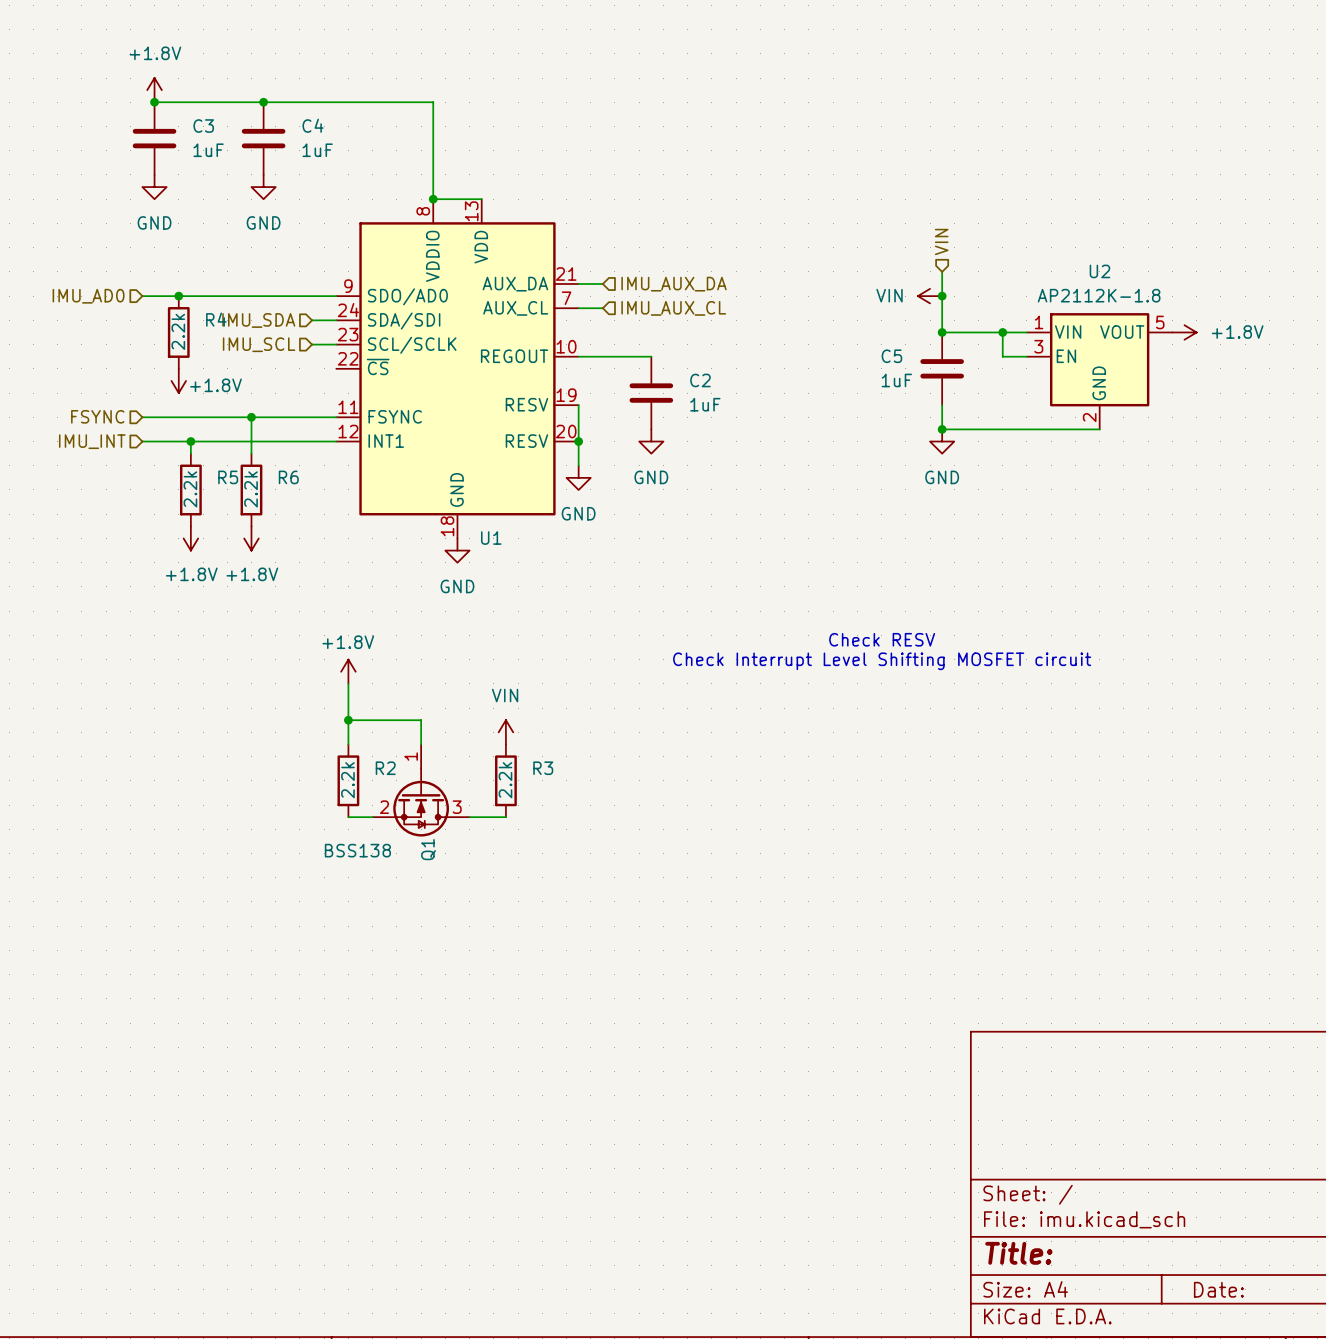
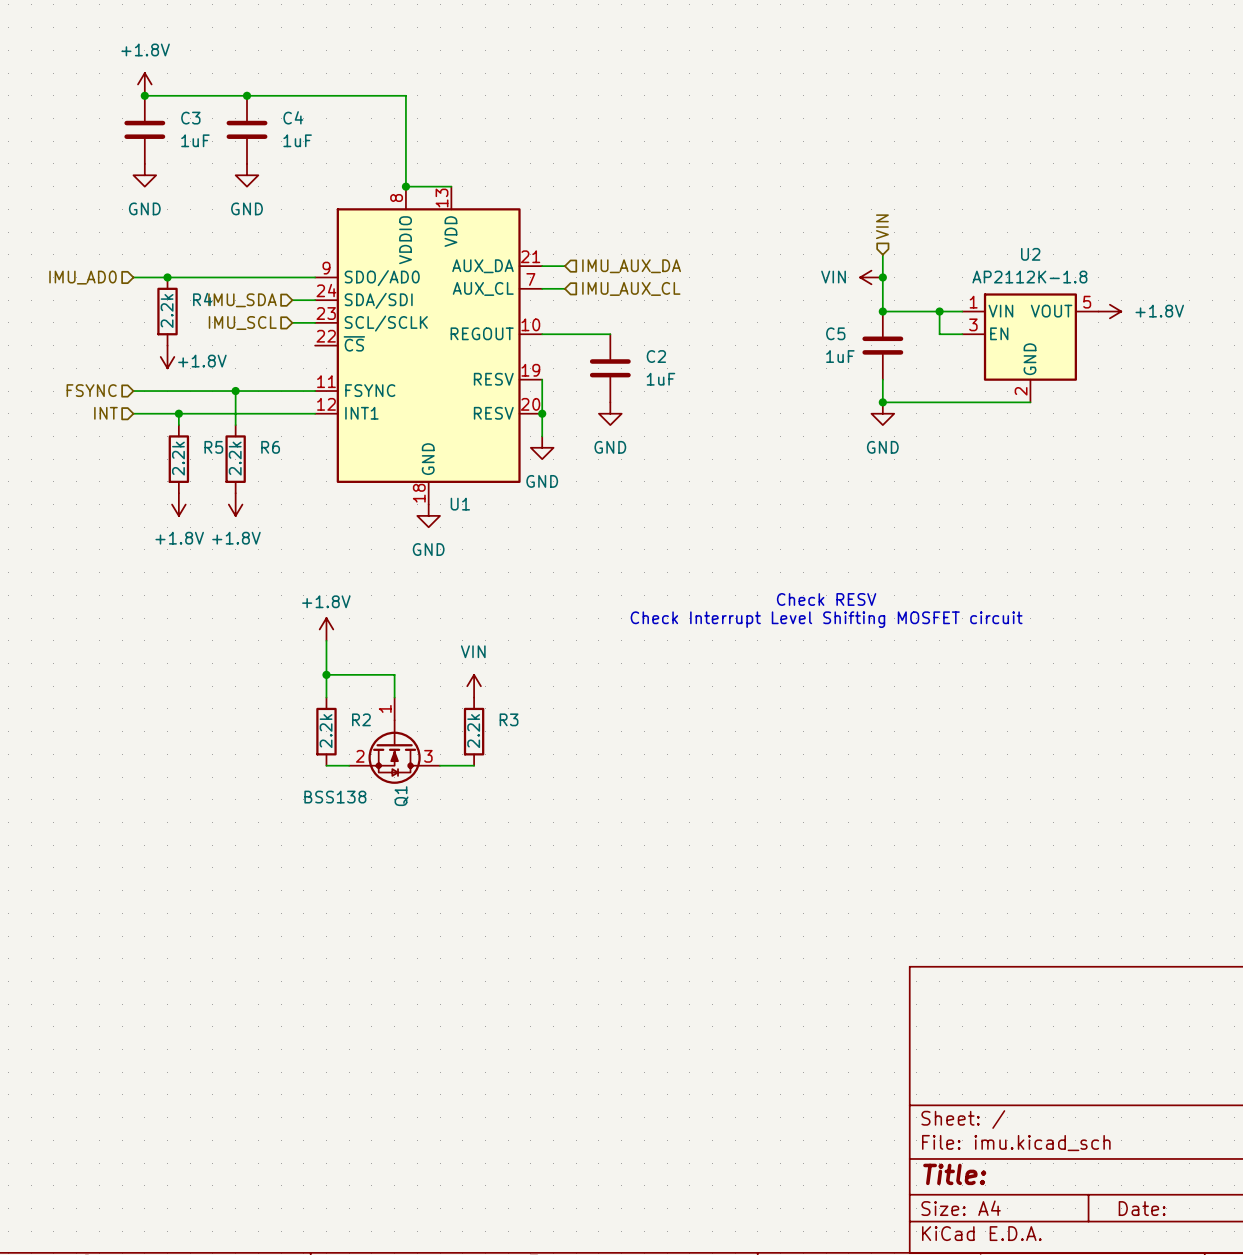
hierarchical label: IMU_INT (92, 441) -> INT (105, 413)

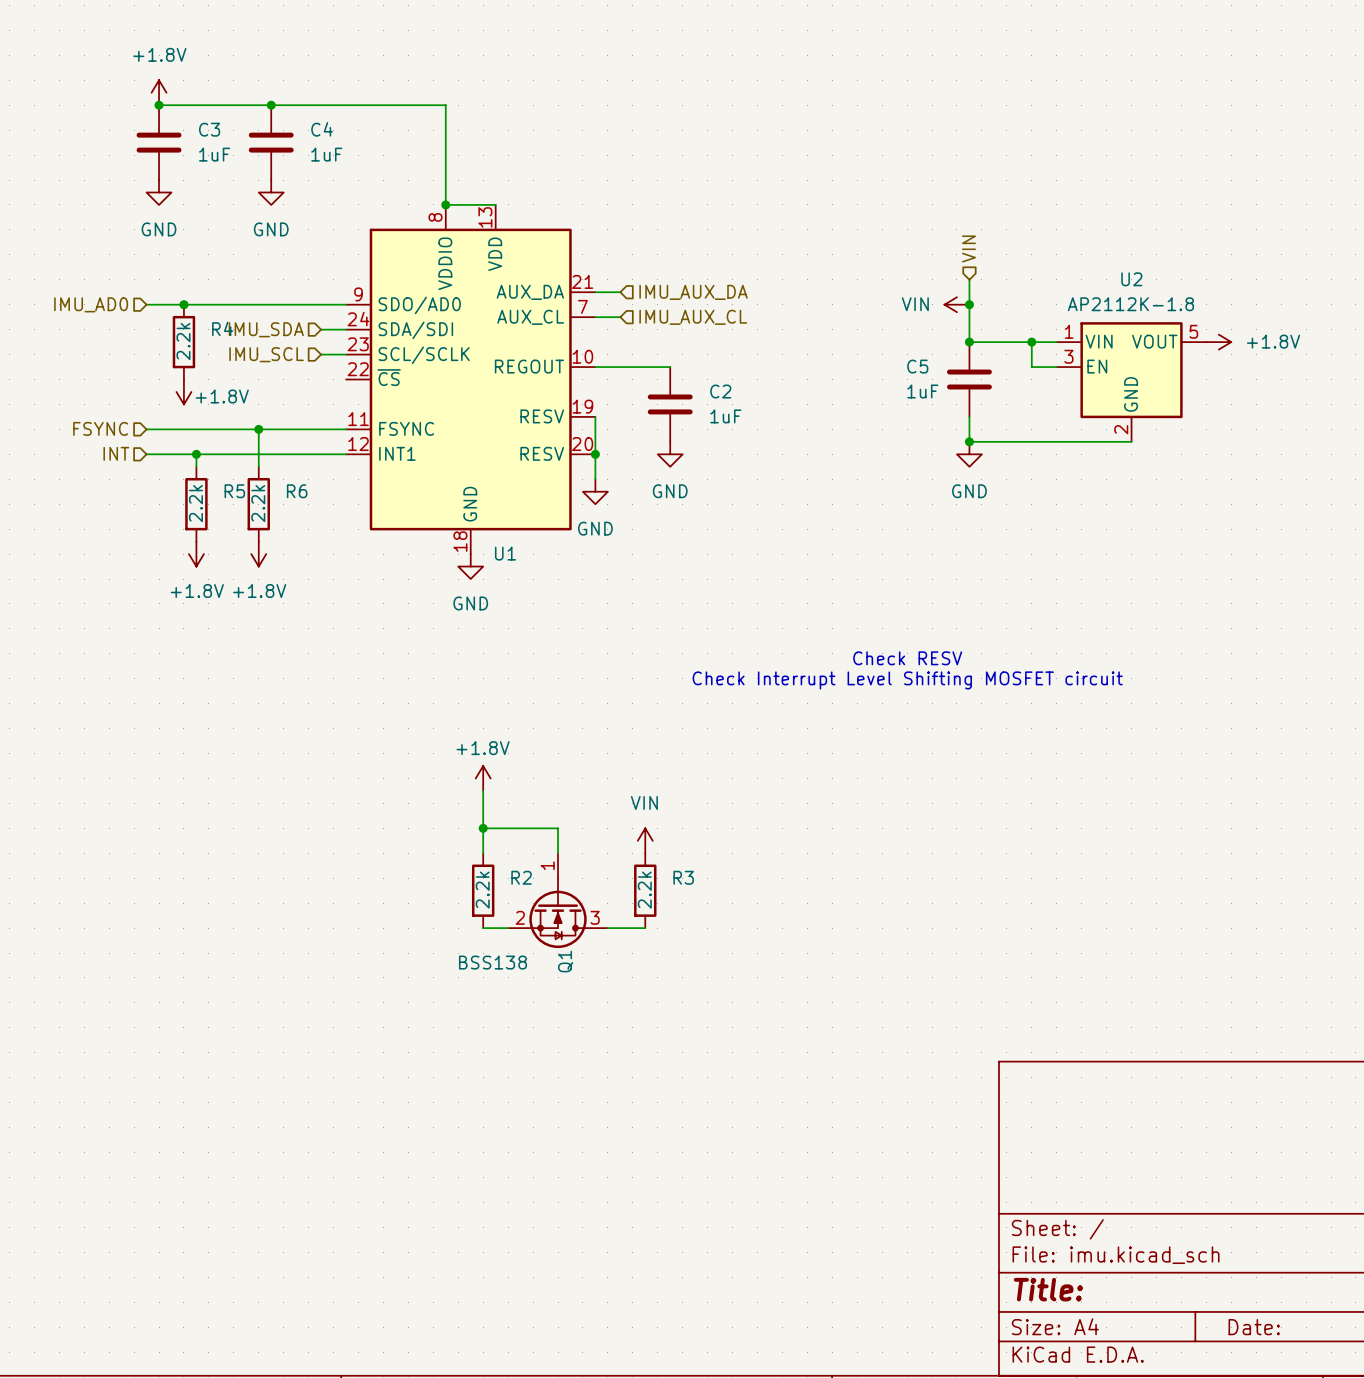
power symbol position: +1.8V (326, 629) -> +1.8V (483, 778)
wire: (326, 640) (326, 697) -> (483, 790) (483, 853)
wire: (326, 674) (394, 674) (394, 697) -> (483, 828) (558, 828) (558, 853)
junction: (326, 674) -> none
power symbol position: VIN (474, 686) -> VIN (645, 840)
R2 position: (326, 731) -> (483, 890)
R3 position: (474, 731) -> (645, 890)
Q1 position: (394, 740) -> (558, 900)
junction: none -> (483, 828)
wire: (326, 765) (349, 765) -> (483, 928) (508, 928)
wire: (440, 765) (474, 765) -> (607, 928) (645, 928)

